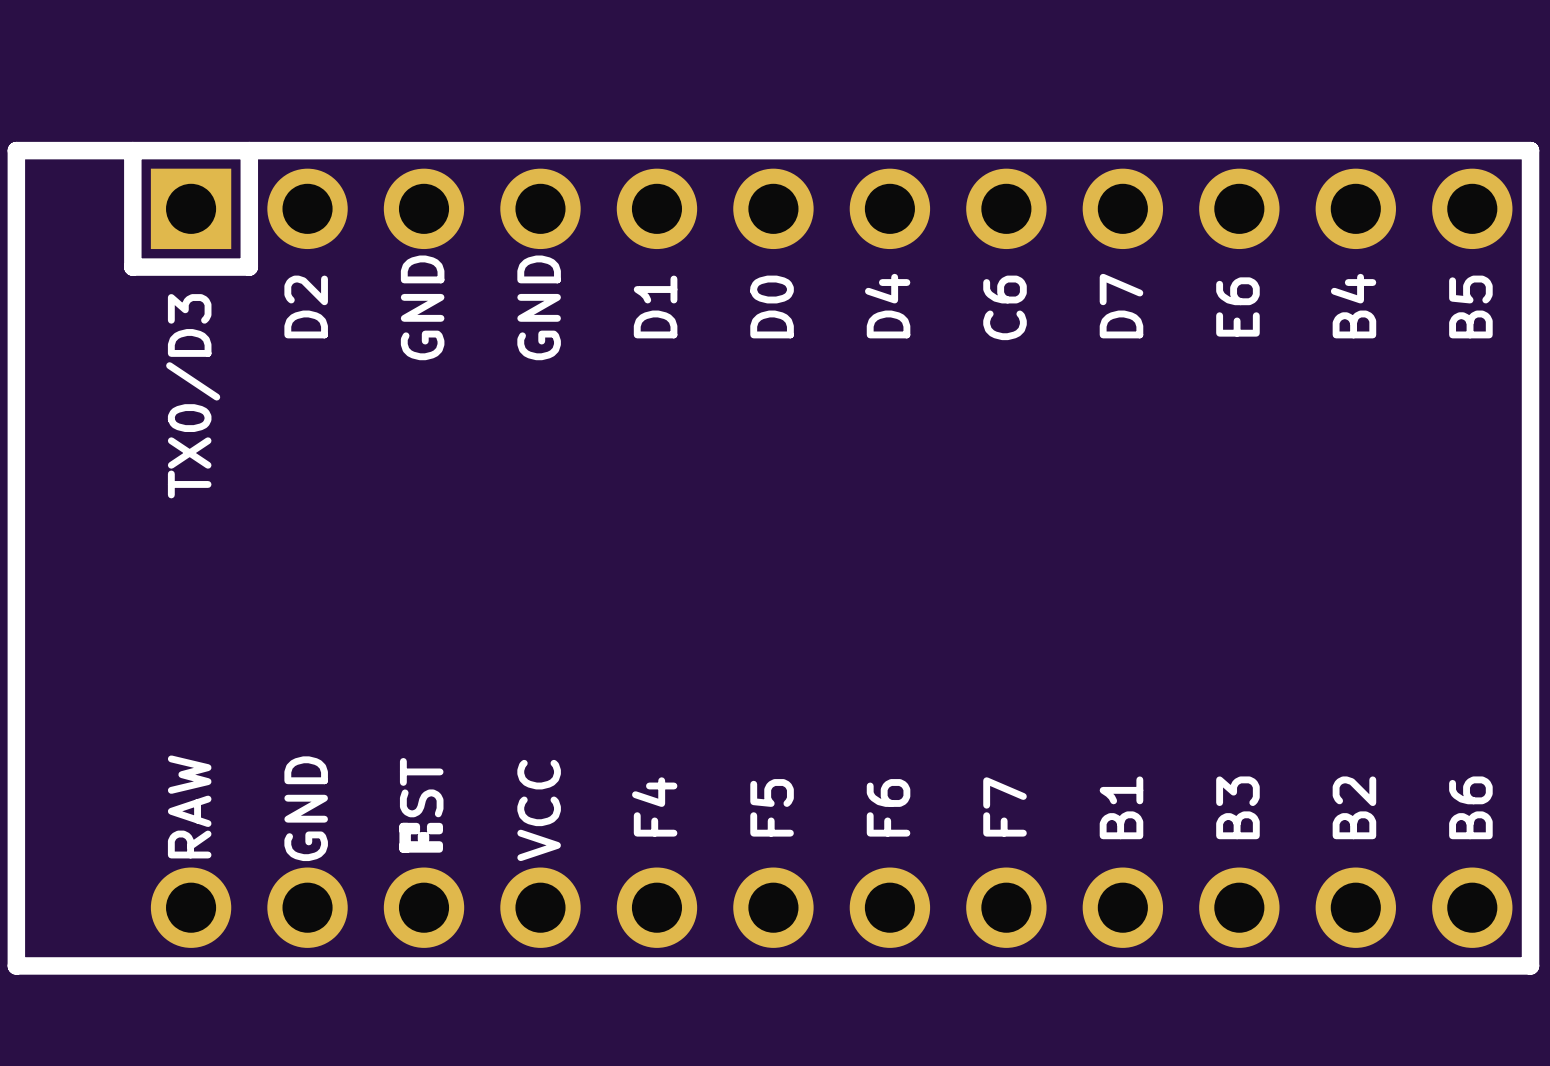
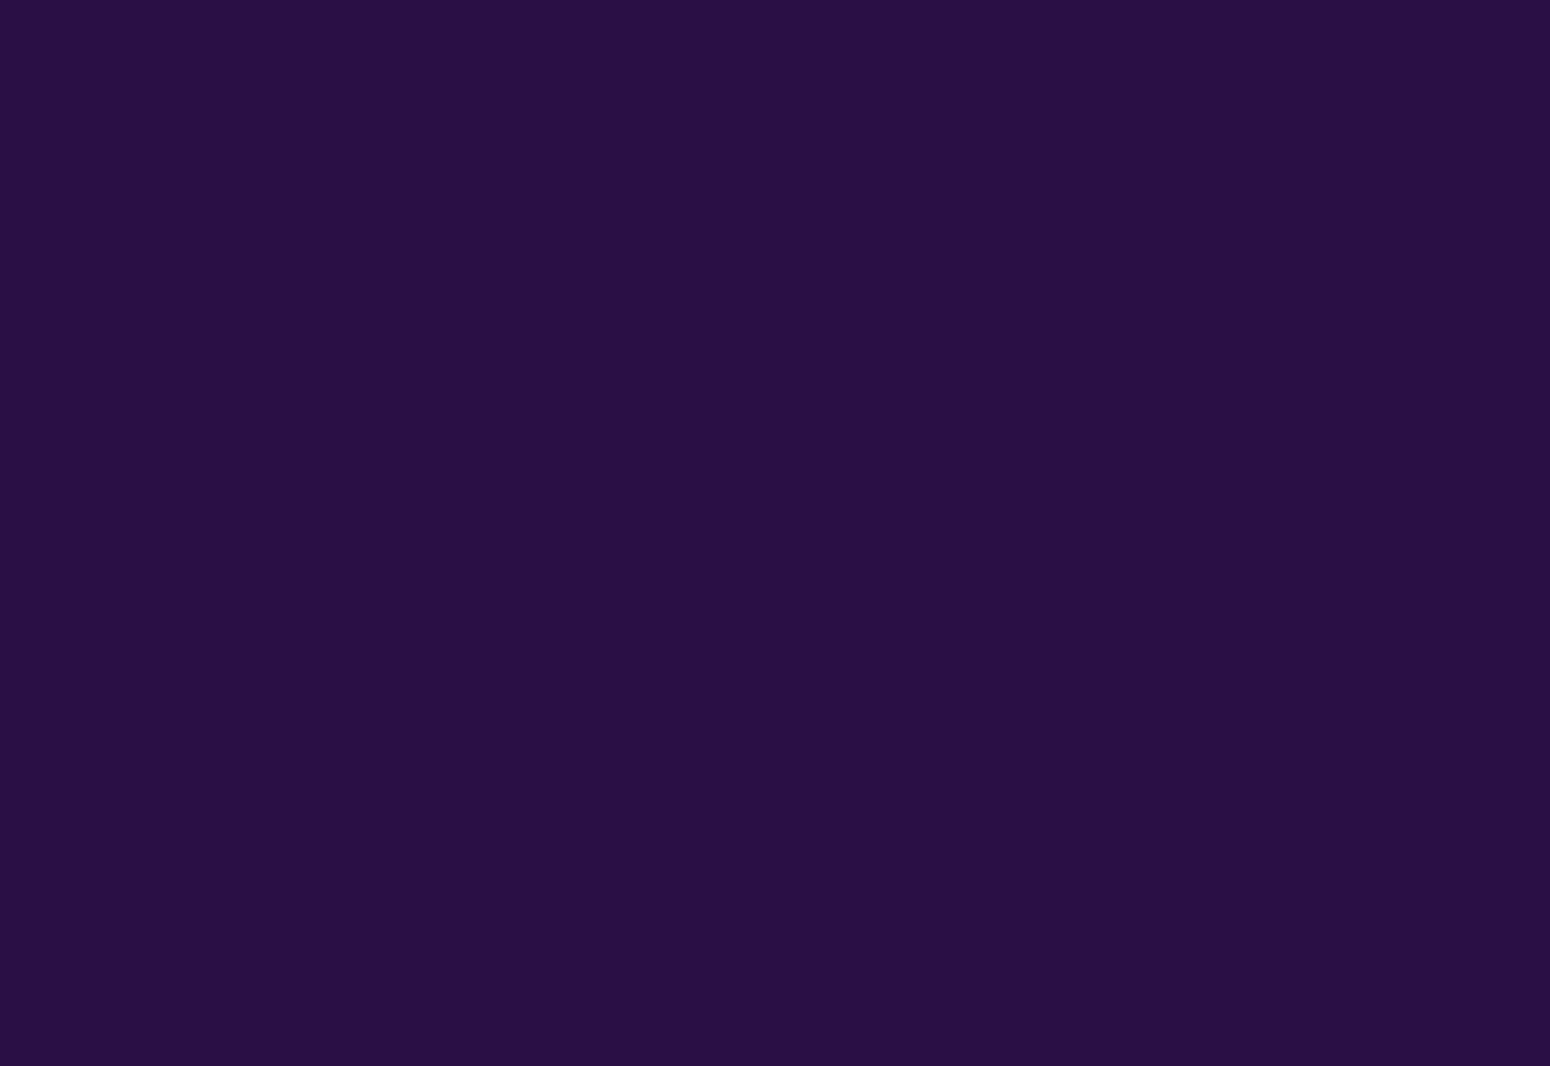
part: (773, 558) -> none

